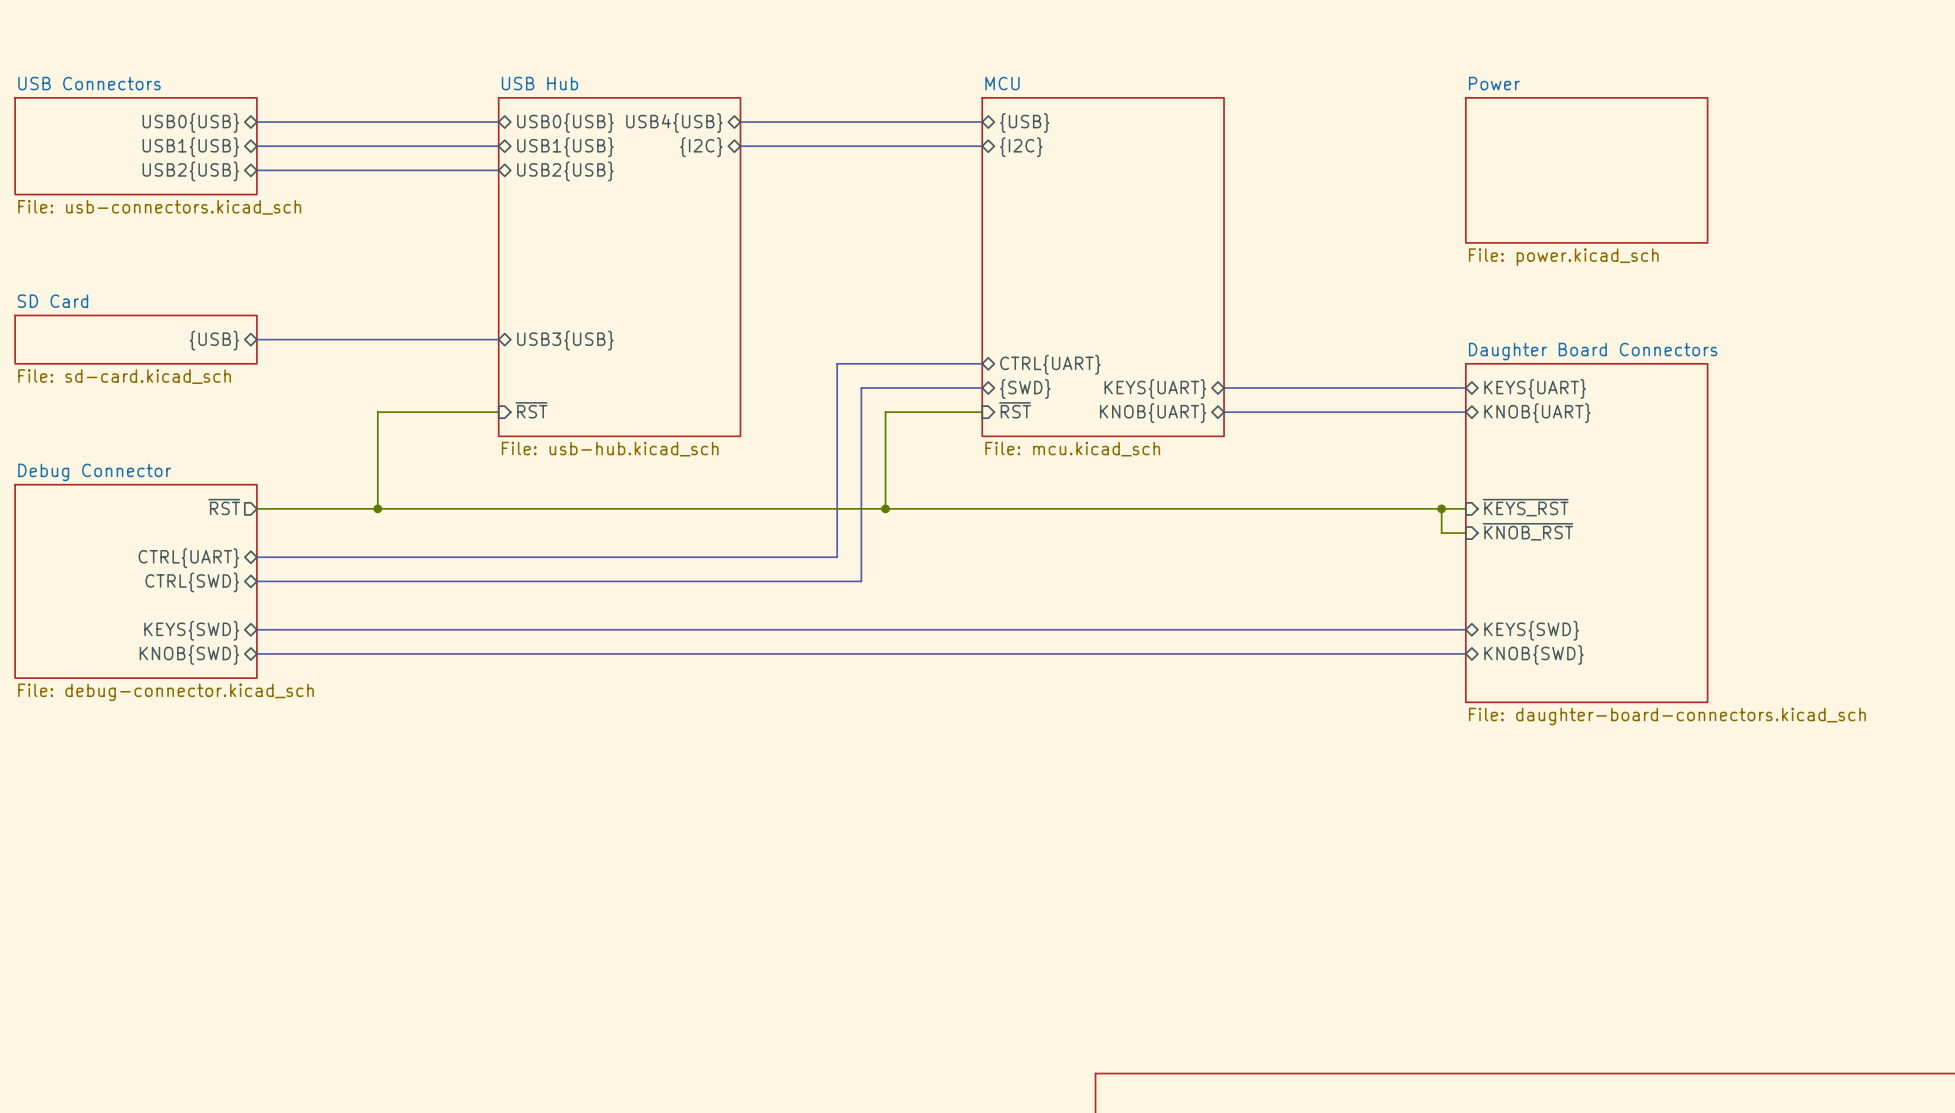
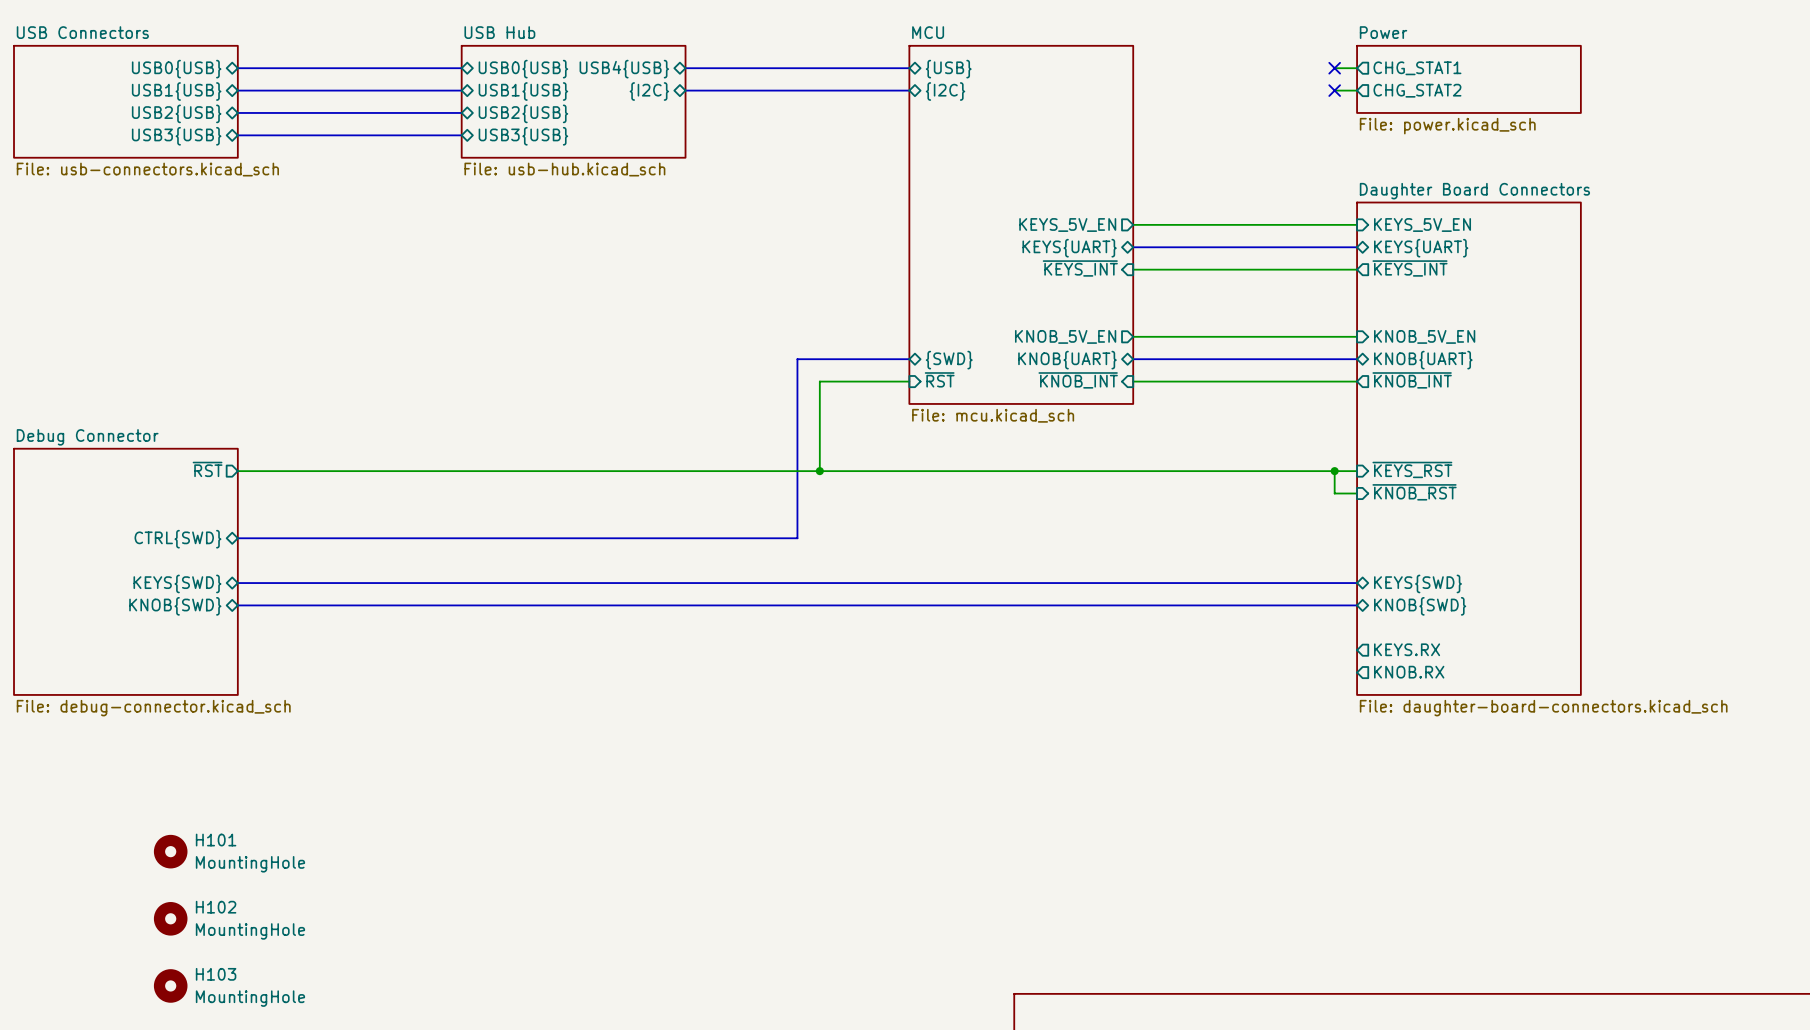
bus: none -> (237, 68) (461, 68)
wire: none -> (1334, 68) (1357, 68)
no-connect mark: none -> (1334, 68)
sheet pin: none -> CHG_STAT1 (1417, 68)
sheet pin: none -> USB0{USB} (176, 69)
sheet pin: none -> USB0{USB} (523, 69)
sheet Power: none -> File: power.kicad_sch (1468, 79)
wire: none -> (1334, 90) (1357, 90)
no-connect mark: none -> (1334, 90)
sheet pin: none -> CHG_STAT2 (1417, 90)
sheet pin: none -> USB1{USB} (176, 91)
sheet pin: none -> USB1{USB} (523, 91)
sheet USB Connectors: none -> File: usb-connectors.kicad_sch (125, 101)
sheet USB Hub: none -> File: usb-hub.kicad_sch (573, 101)
bus: (740, 122) (982, 122) -> (685, 68) (909, 68)
sheet pin: USB0{USB} (190, 123) -> USB2{USB} (176, 113)
sheet pin: USB0{USB} (565, 123) -> USB2{USB} (523, 113)
sheet pin position: USB4{USB} (674, 123) -> USB4{USB} (624, 69)
sheet pin position: {USB} (1024, 123) -> {USB} (948, 69)
sheet USB Connectors: File: usb-connectors.kicad_sch (136, 146) -> none
bus: (740, 146) (982, 146) -> (685, 90) (909, 90)
sheet pin: USB1{USB} (190, 147) -> USB3{USB} (176, 136)
sheet pin: USB1{USB} (565, 147) -> USB3{USB} (523, 136)
sheet pin position: {I2C} (701, 147) -> {I2C} (649, 91)
sheet pin position: {I2C} (1021, 147) -> {I2C} (945, 91)
bus: (256, 170) (498, 170) -> (237, 90) (461, 90)
sheet Power: File: power.kicad_sch (1586, 170) -> none
sheet pin: USB2{USB} (190, 171) -> none
sheet pin: USB2{USB} (565, 171) -> none
sheet MCU: none -> File: mcu.kicad_sch (1021, 224)
wire: none -> (1133, 224) (1357, 224)
sheet pin: none -> KEYS_5V_EN (1067, 225)
sheet pin: none -> KEYS_5V_EN (1422, 225)
sheet USB Hub: File: usb-hub.kicad_sch (619, 267) -> none
sheet MCU: File: mcu.kicad_sch (1103, 267) -> none
sheet pin: none -> KEYS{UART} (1069, 248)
sheet pin: none -> KEYS{UART} (1421, 248)
sheet pin: none -> ~{KEYS_INT} (1080, 268)
sheet pin: none -> ~{KEYS_INT} (1410, 268)
wire: none -> (1133, 269) (1357, 269)
sheet SD Card: File: sd-card.kicad_sch (136, 339) -> none
bus: (256, 339) (498, 339) -> none
sheet pin: {USB} (214, 340) -> none
sheet pin: USB3{USB} (565, 340) -> none
bus: (982, 363) (837, 363) (837, 557) (256, 557) -> none
sheet pin: none -> KNOB_5V_EN (1065, 336)
wire: none -> (1133, 336) (1357, 336)
sheet pin: none -> KNOB_5V_EN (1424, 336)
sheet pin: CTRL{UART} (1050, 364) -> none
sheet pin: KEYS{UART} (1155, 388) -> KNOB{UART} (1067, 360)
sheet pin: KEYS{UART} (1535, 388) -> KNOB{UART} (1423, 360)
sheet pin: ~{RST} (531, 410) -> none
wire: (498, 412) (377, 412) (377, 508) -> none
bus: (1224, 412) (1465, 412) -> (1133, 247) (1357, 247)
sheet pin shape: bidirectional (1153, 413) -> input (1078, 380)
sheet pin: KNOB{UART} (1153, 413) -> ~{KNOB_INT} (1078, 380)
sheet pin shape: bidirectional (1537, 413) -> output (1412, 380)
sheet pin: KNOB{UART} (1537, 413) -> ~{KNOB_INT} (1412, 380)
sheet Daughter Board Connectors: none -> File: daughter-board-connectors.kicad_sch (1468, 448)
junction: (377, 508) -> none
sheet Daughter Board Connectors: File: daughter-board-connectors.kicad_sch (1586, 533) -> none
sheet pin: CTRL{UART} (188, 558) -> none
sheet Debug Connector: File: debug-connector.kicad_sch (136, 581) -> none
sheet Debug Connector: none -> File: debug-connector.kicad_sch (125, 571)
sheet pin: none -> KEYS.RX (1407, 649)
sheet pin: none -> KNOB.RX (1409, 672)
H101: none -> MountingHole (170, 851)
H102: none -> MountingHole (170, 918)
H103: none -> MountingHole (170, 985)

